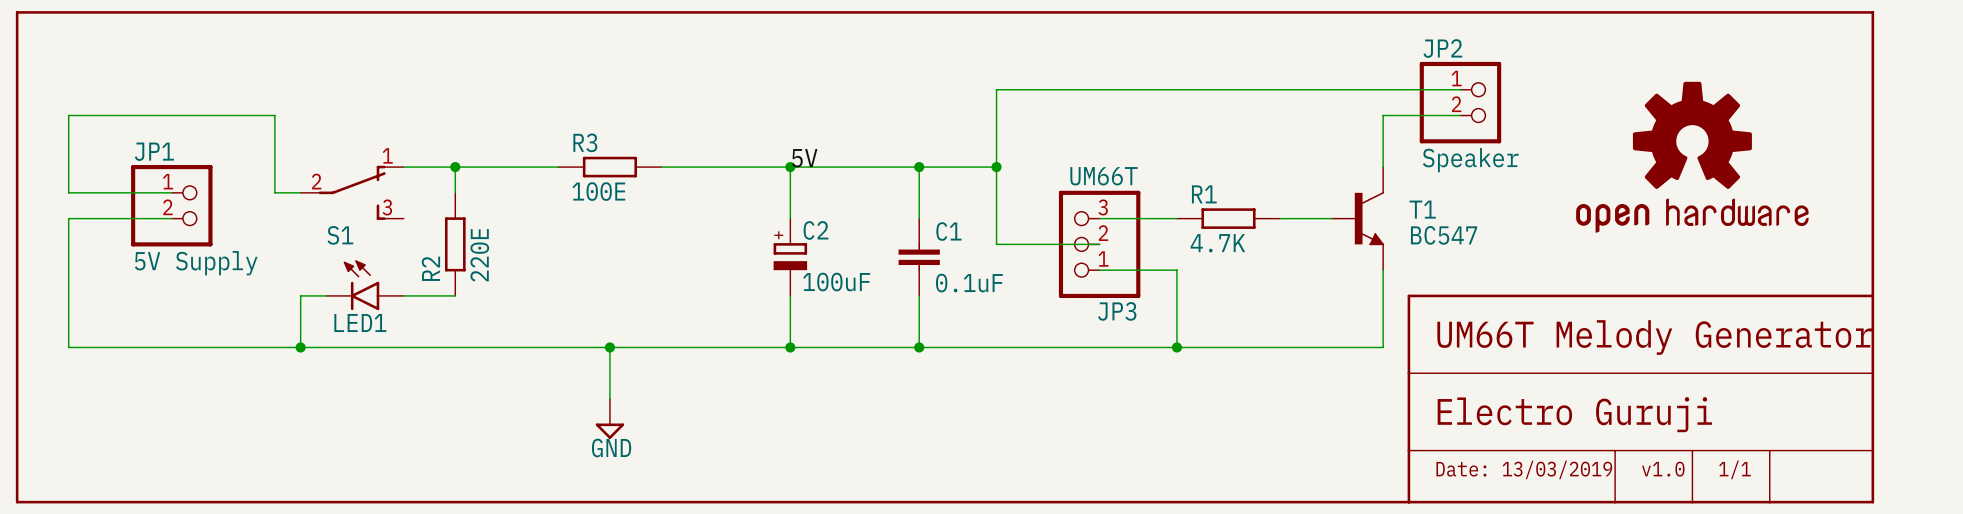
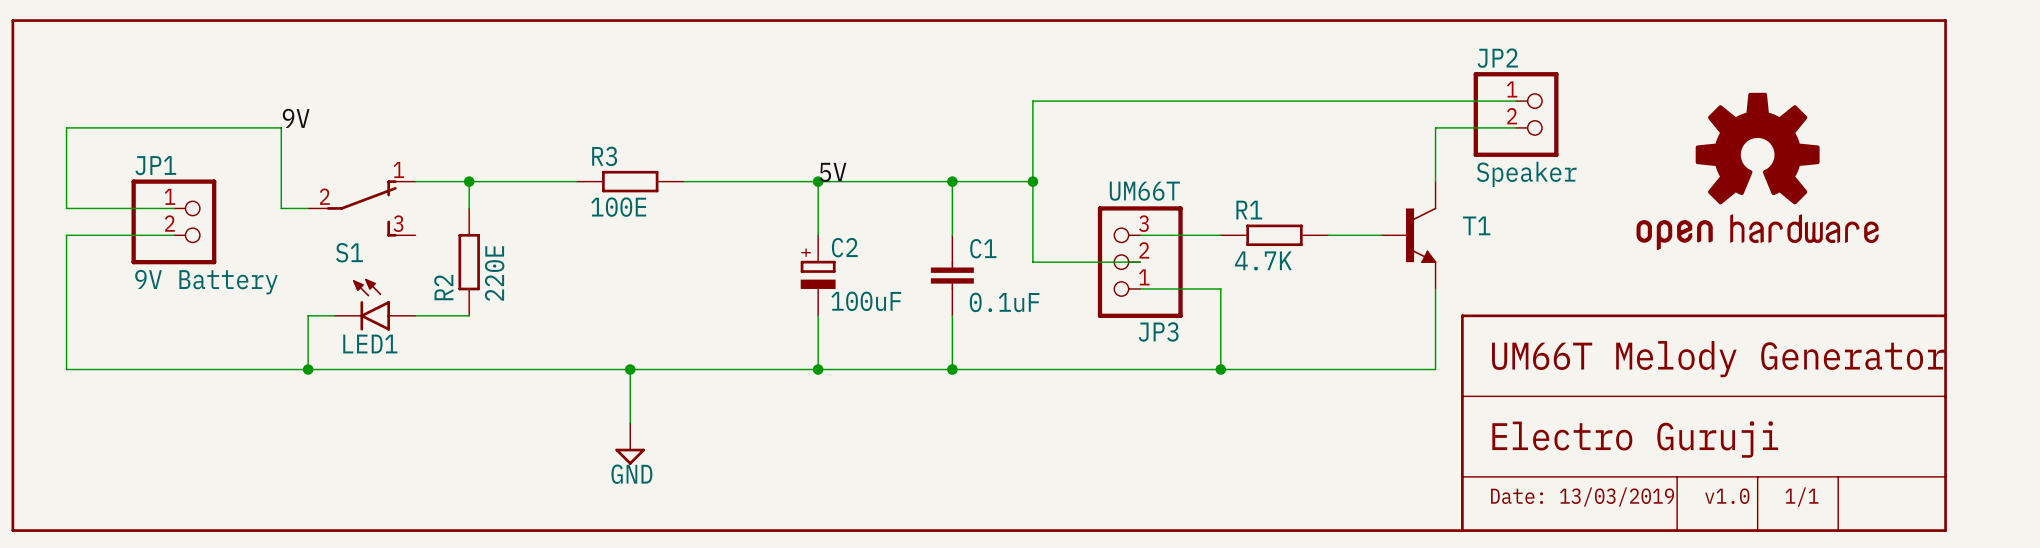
label: none -> 9V (296, 118)
T1 value: BC547 (1444, 235) -> none
JP1 value: 5V Supply (196, 263) -> 9V Battery (206, 282)

